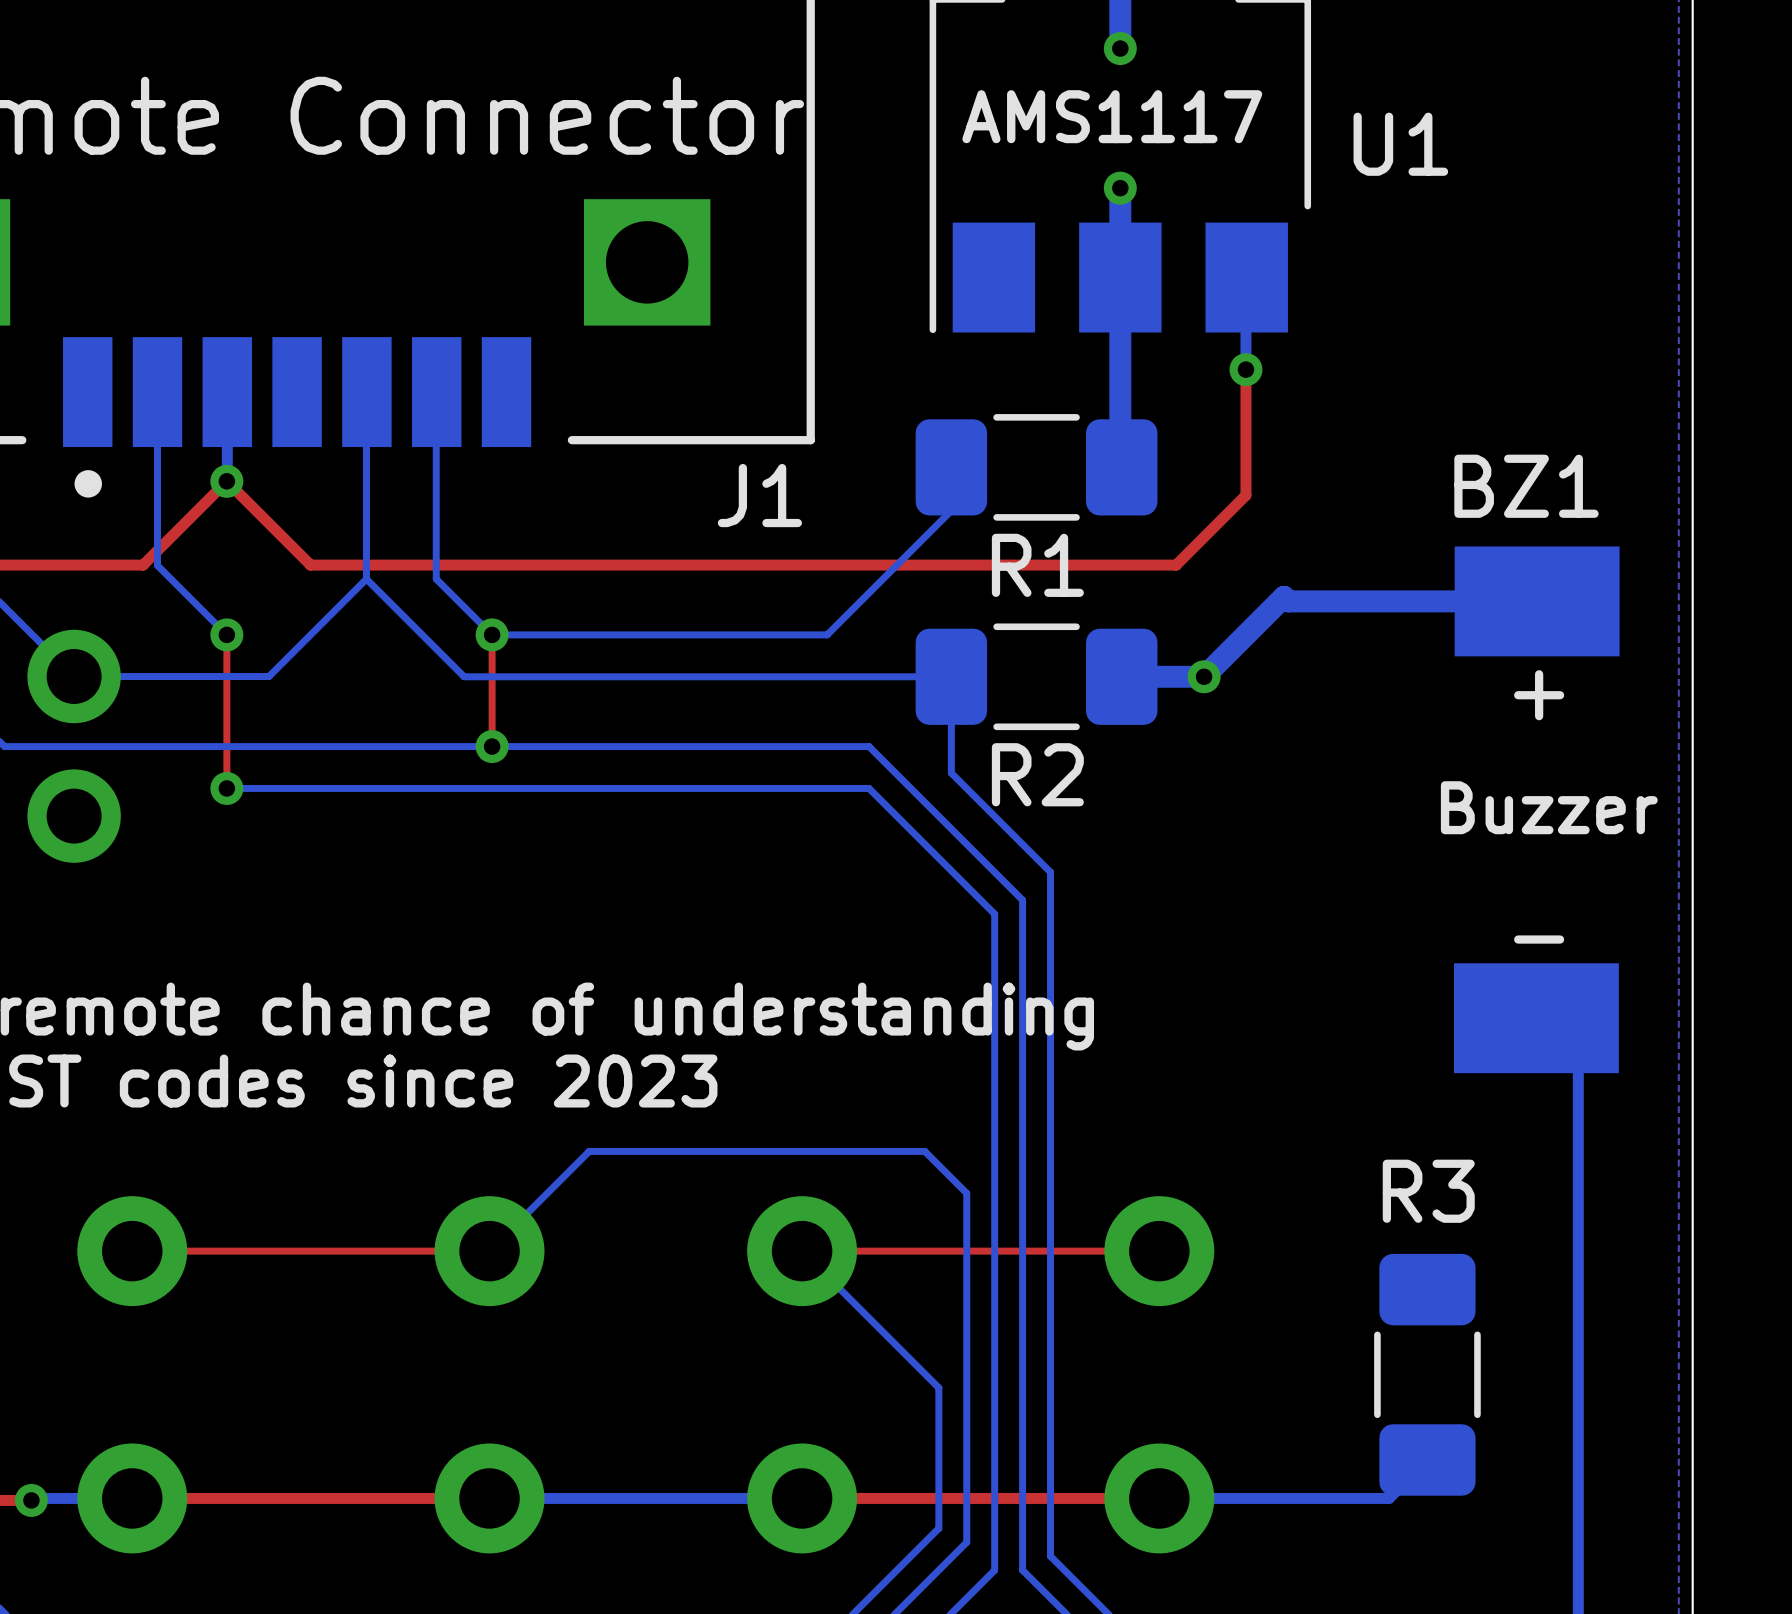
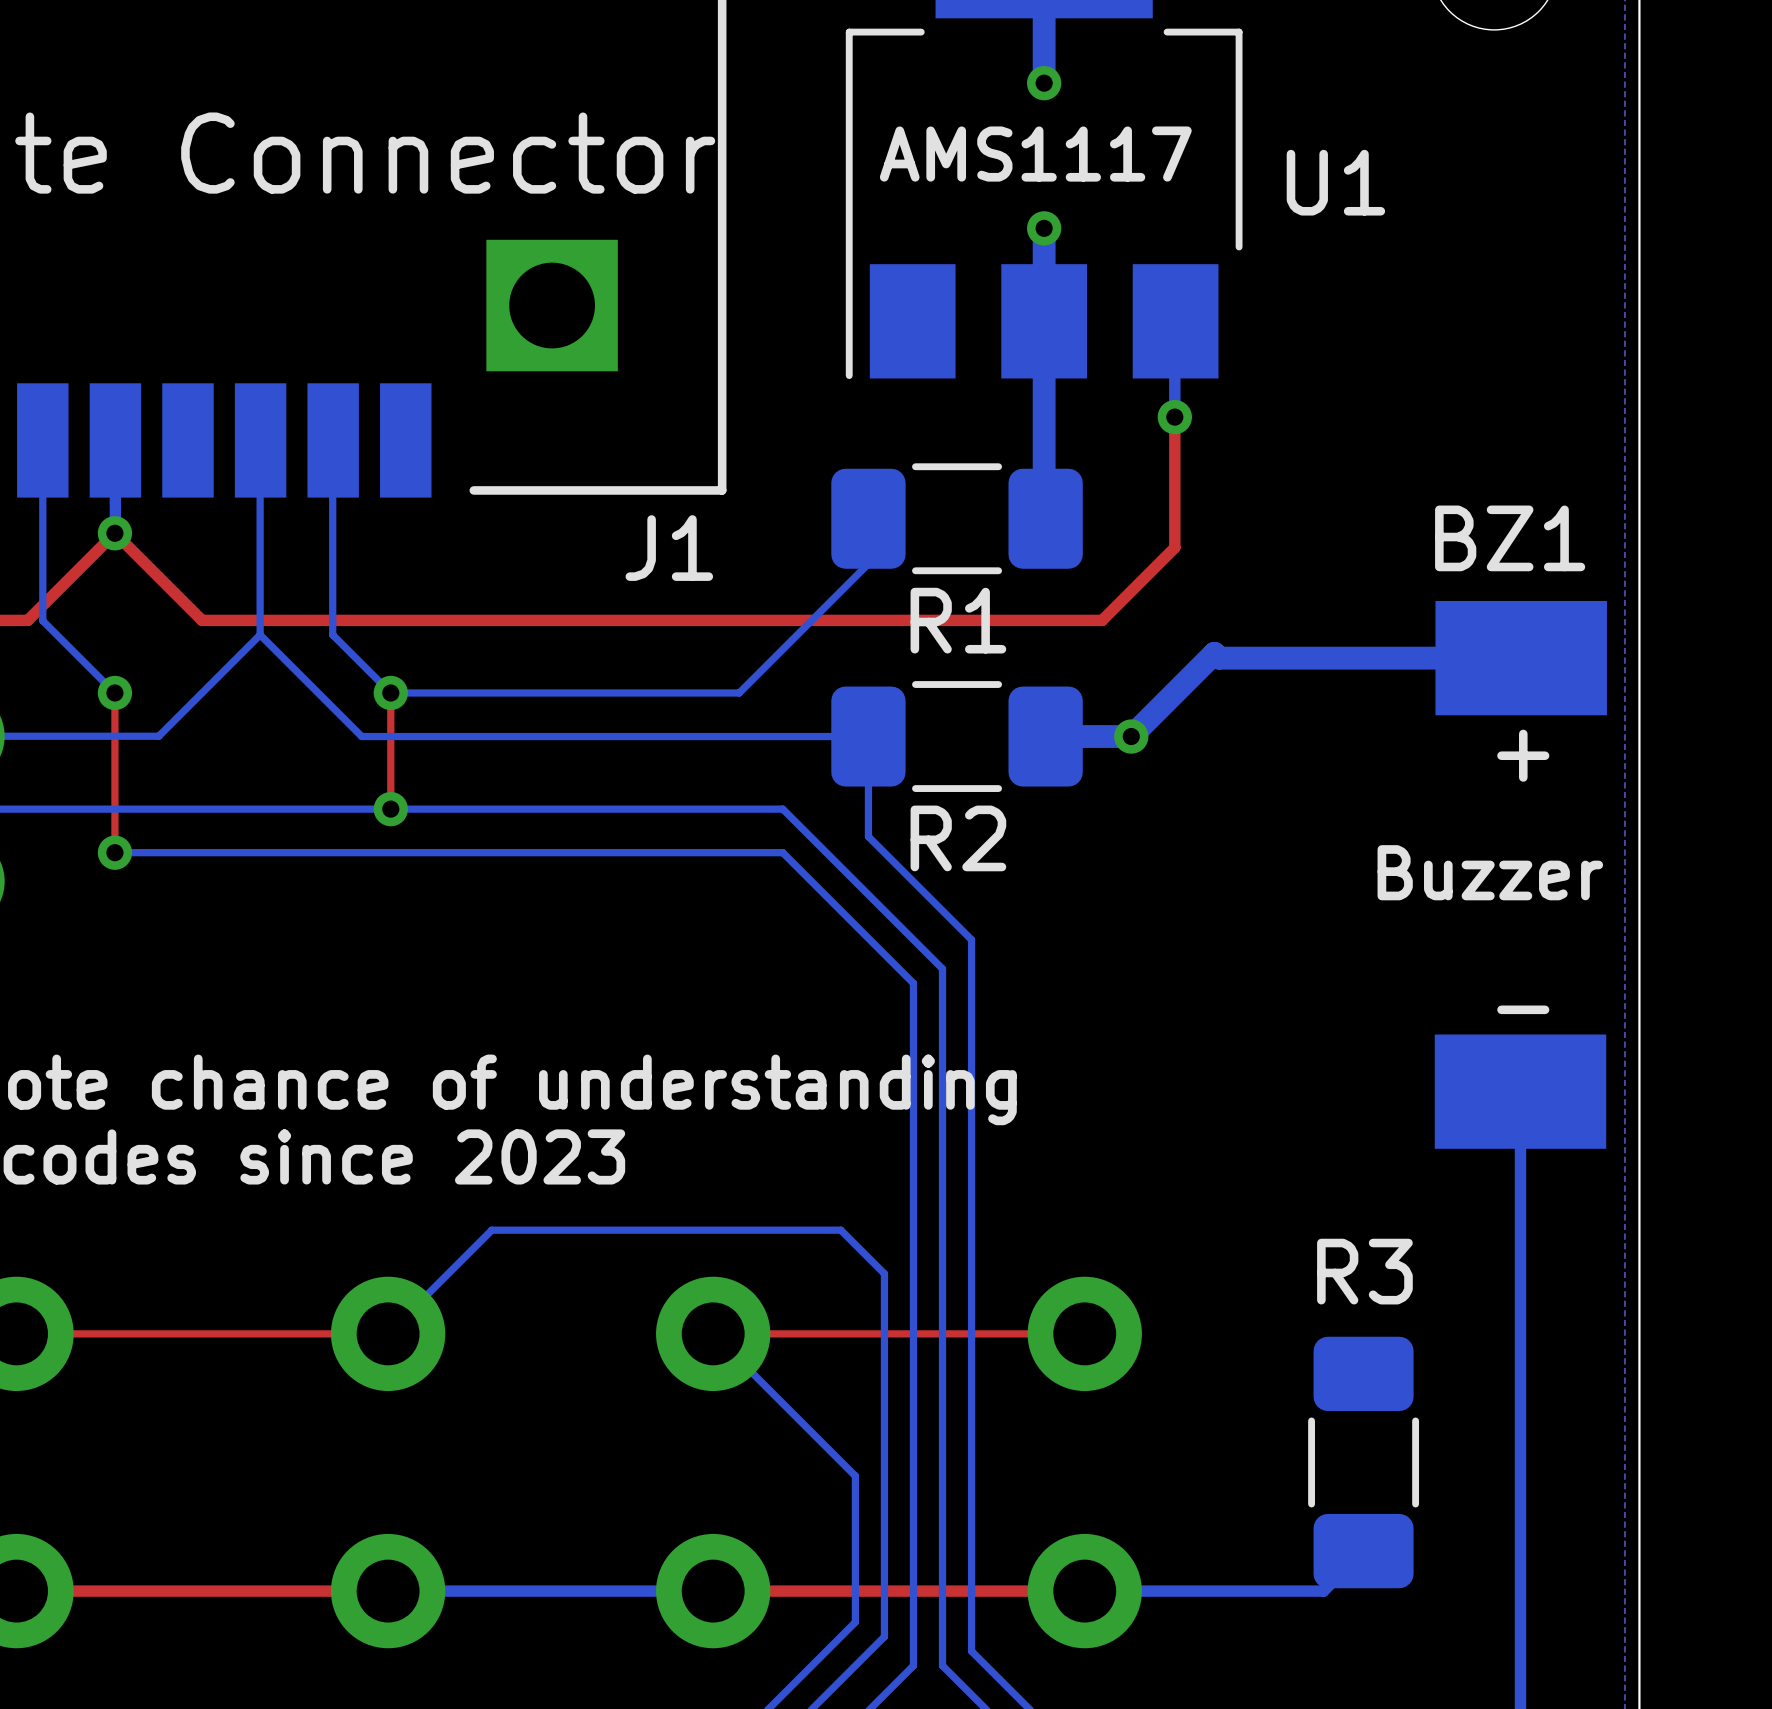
BZ1 position: (1536, 809) -> (1520, 874)

